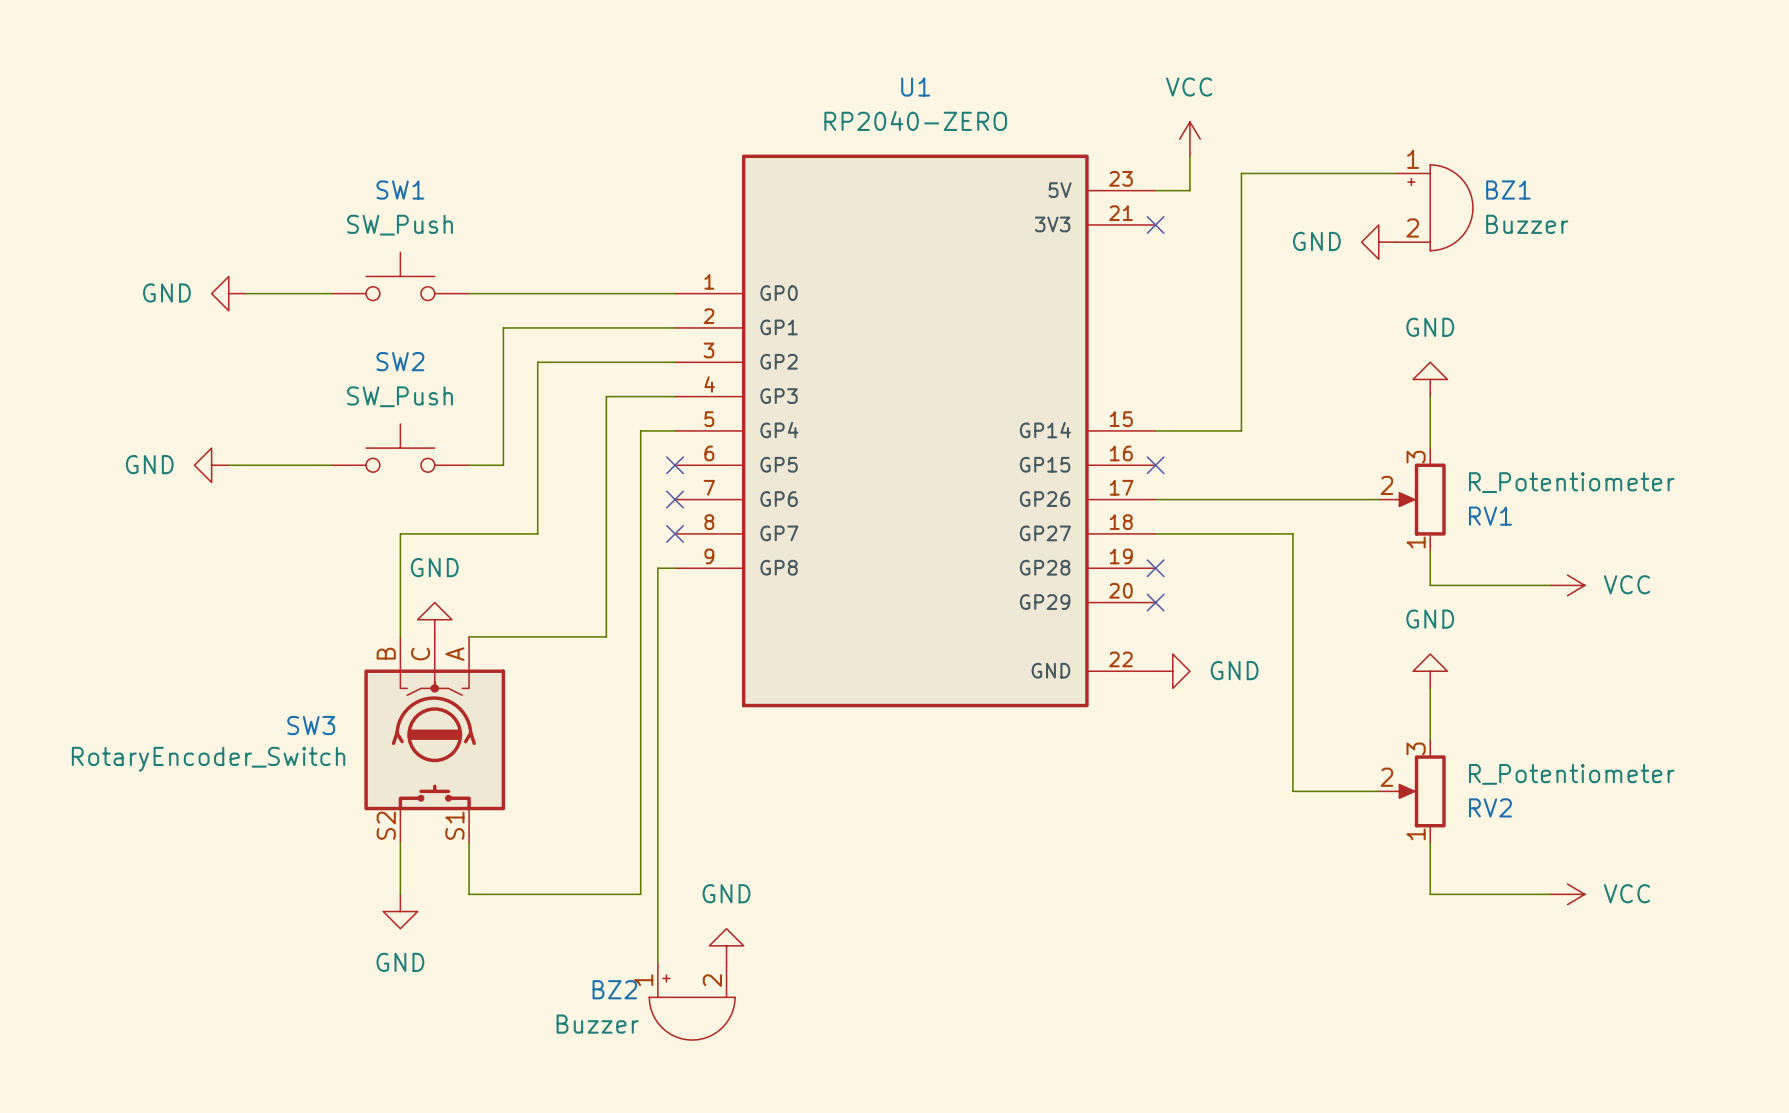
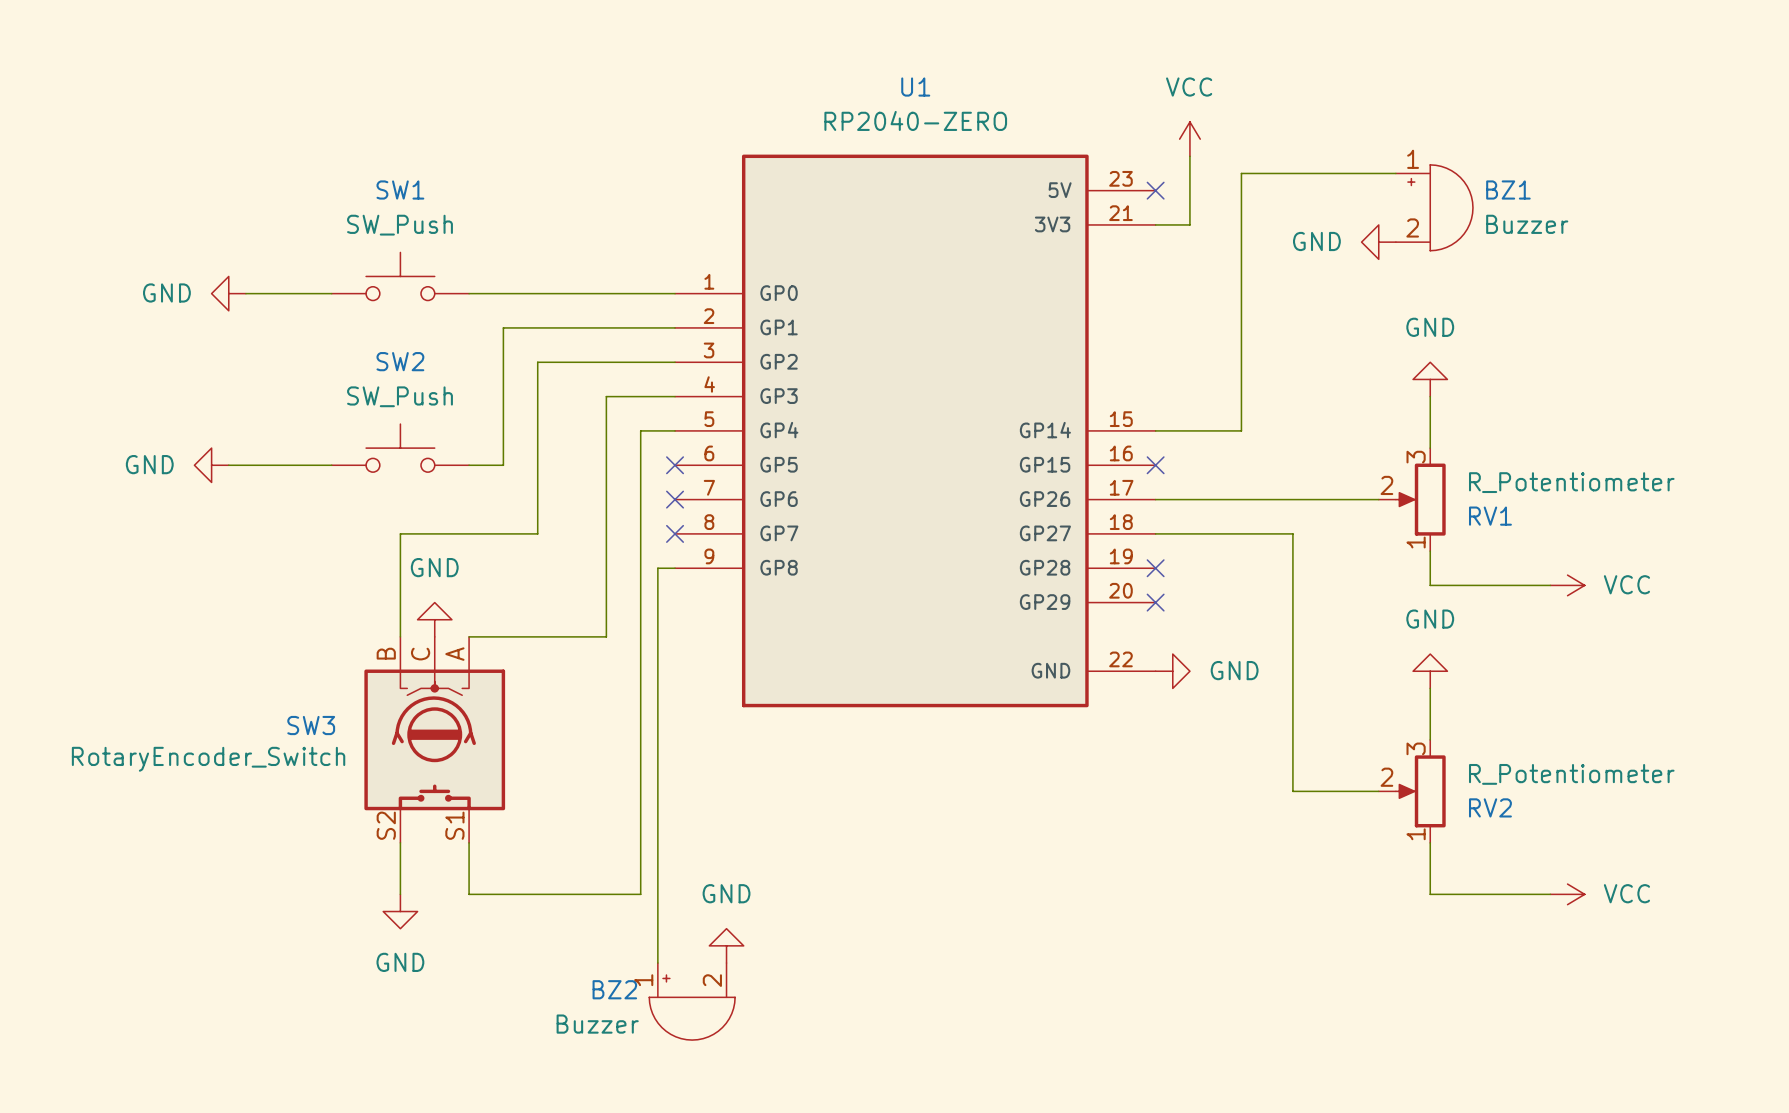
wire: (1155, 190) (1189, 190) -> (1155, 224) (1189, 224) (1189, 190)
no-connect mark position: (1155, 224) -> (1155, 190)

